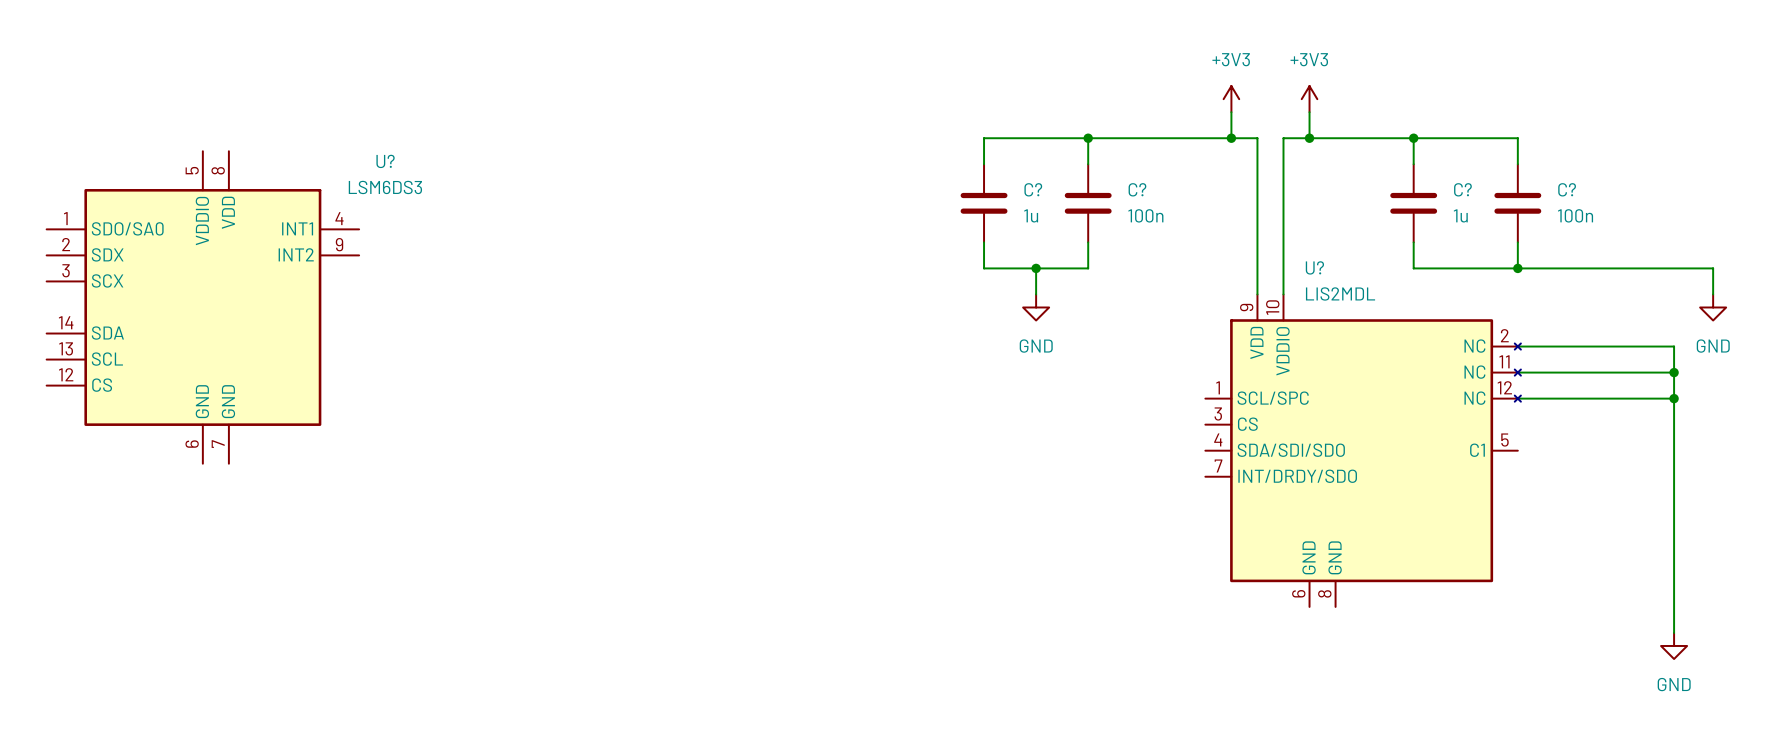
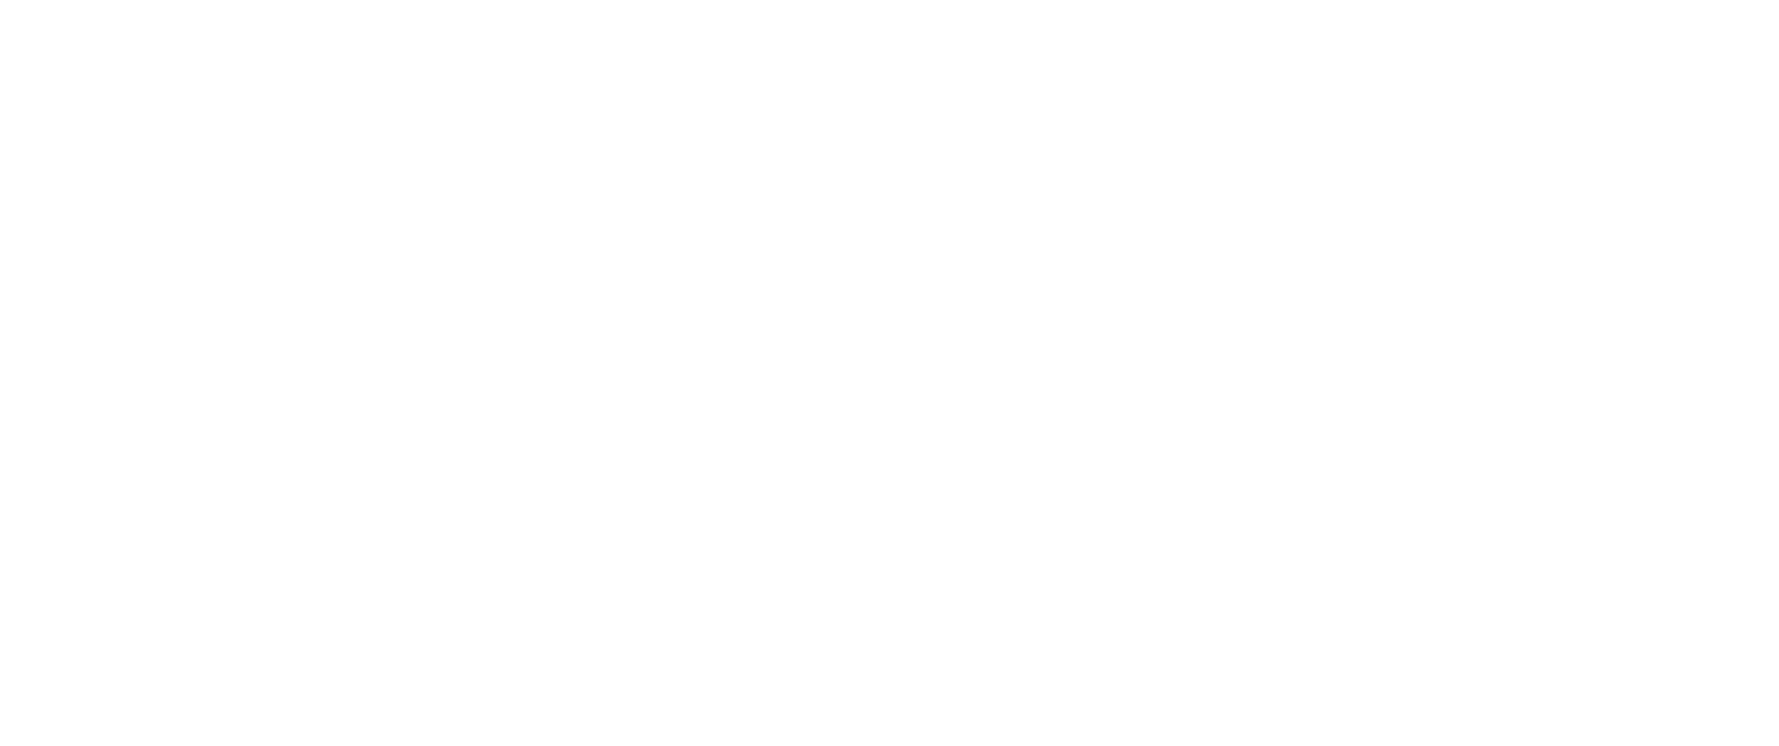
power symbol: +3V3 (1231, 99) -> none
power symbol: +3V3 (1309, 99) -> none
wire: (1231, 112) (1231, 138) -> none
wire: (1309, 112) (1309, 138) -> none
wire: (1088, 138) (1088, 164) -> none
junction: (1088, 138) -> none
junction: (1231, 138) -> none
junction: (1309, 138) -> none
wire: (1413, 138) (1413, 164) -> none
junction: (1413, 138) -> none
wire: (984, 164) (984, 138) (1257, 138) (1257, 294) -> none
wire: (1517, 164) (1517, 138) (1283, 138) (1283, 294) -> none
C?: 1u (984, 203) -> none
C?: 100n (1088, 203) -> none
C?: 1u (1413, 203) -> none
C?: 100n (1517, 203) -> none
wire: (984, 242) (984, 268) (1088, 268) (1088, 242) -> none
wire: (1413, 242) (1413, 268) (1713, 268) (1713, 294) -> none
wire: (1517, 242) (1517, 268) -> none
wire: (1036, 268) (1036, 294) -> none
junction: (1036, 268) -> none
junction: (1517, 268) -> none
U?: LSM6DS3 (202, 307) -> none
power symbol: GND (1036, 307) -> none
power symbol: GND (1713, 307) -> none
wire: (1517, 346) (1674, 346) (1674, 632) -> none
wire: (1517, 372) (1674, 372) -> none
junction: (1674, 372) -> none
wire: (1517, 398) (1674, 398) -> none
junction: (1674, 398) -> none
U?: LIS2MDL (1363, 476) -> none
power symbol: GND (1674, 645) -> none

